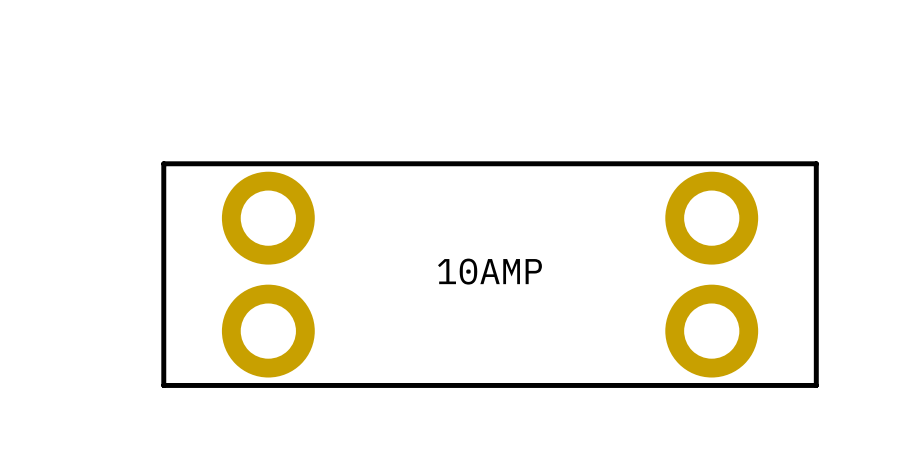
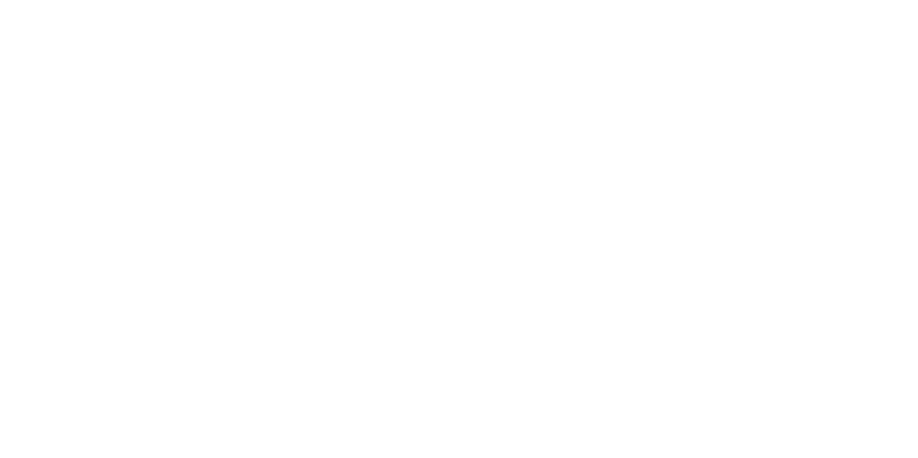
part: 10AMP (490, 274) -> none

